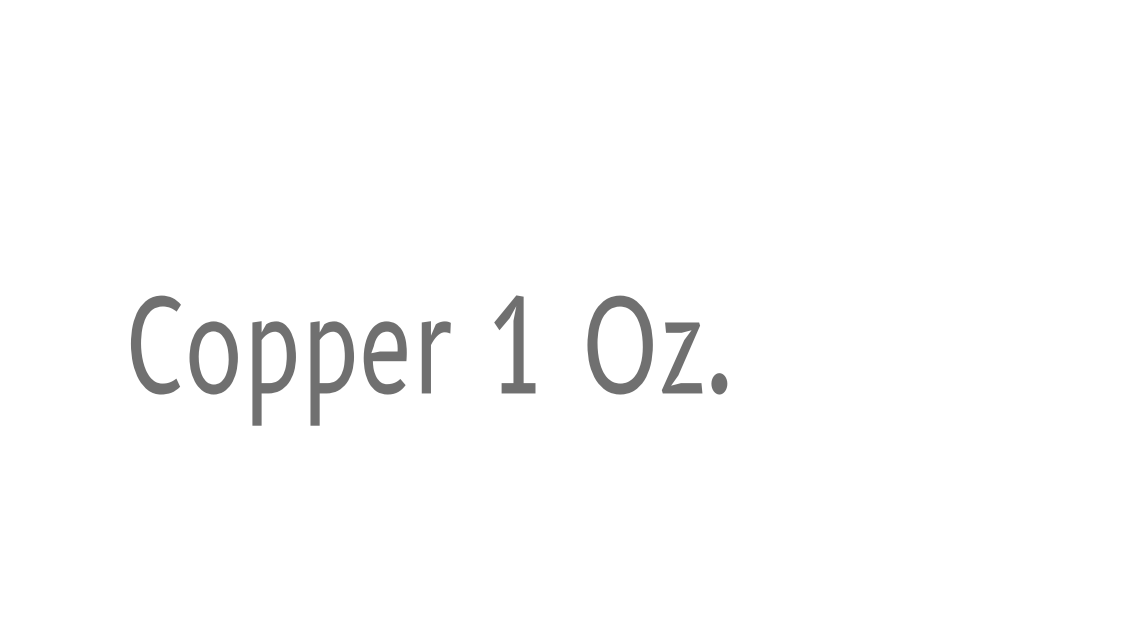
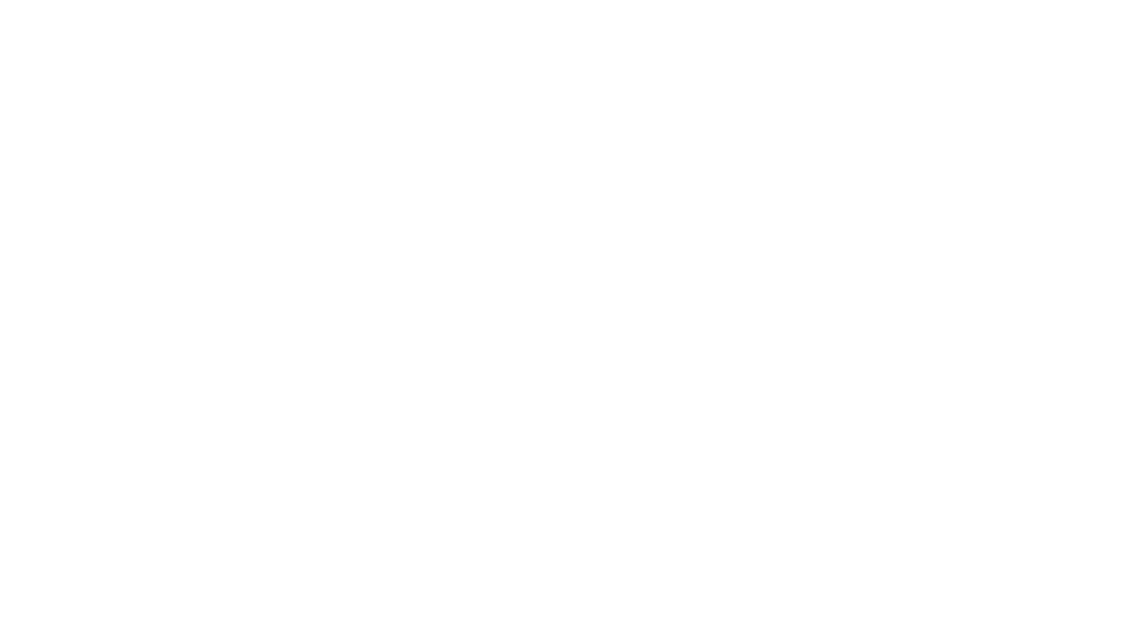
text: Copper 1 Oz. (429, 360) -> none

